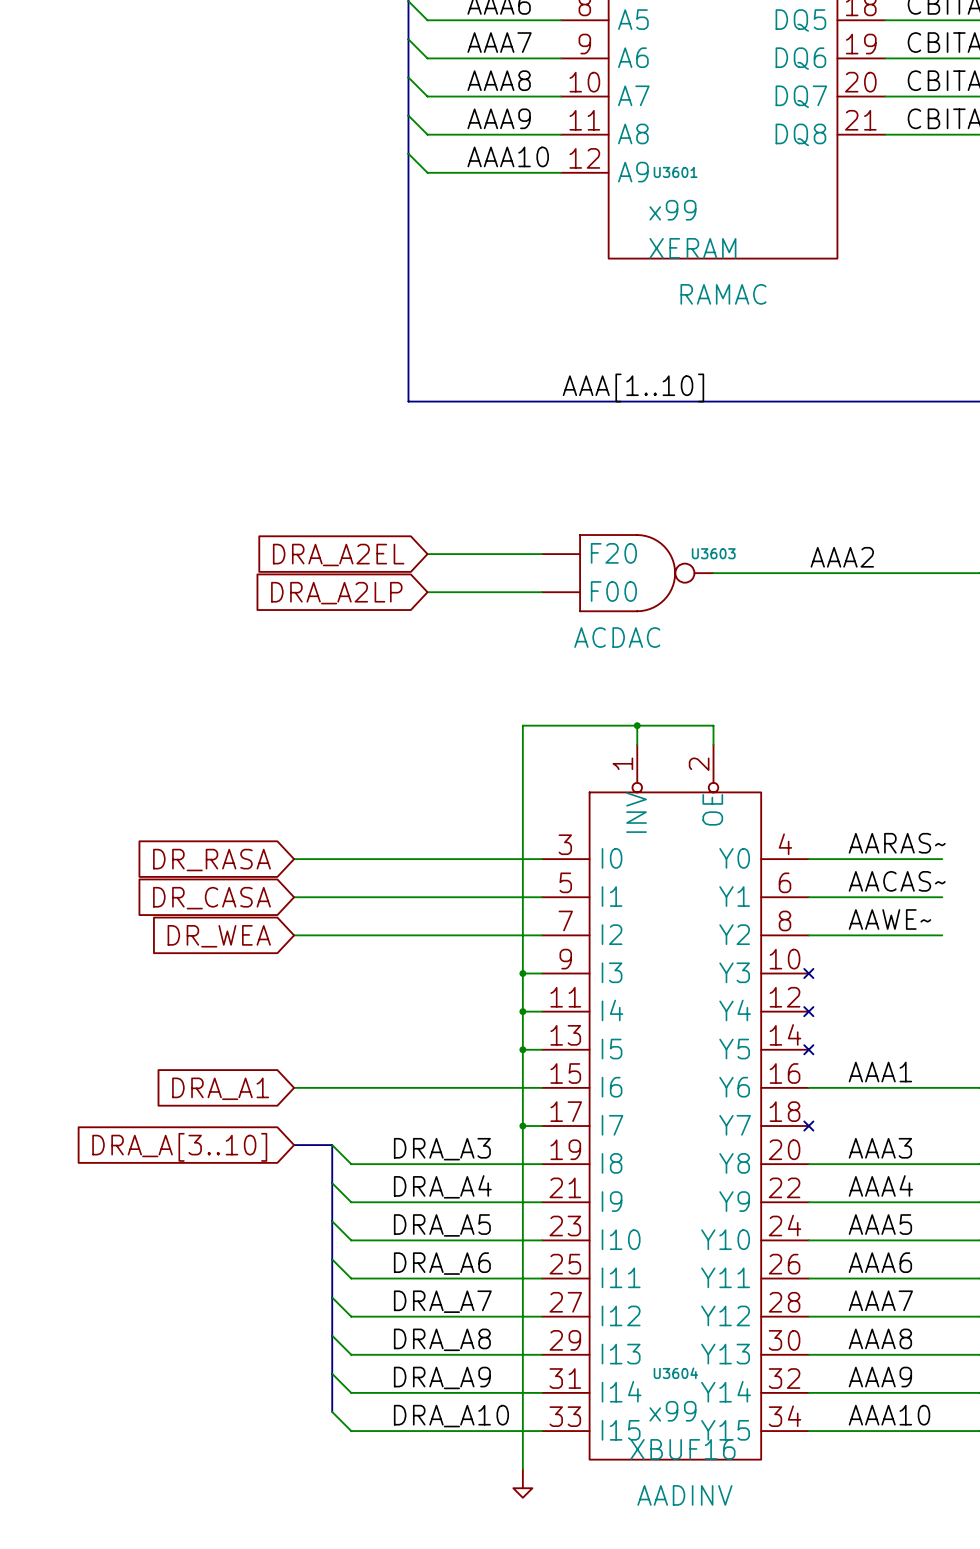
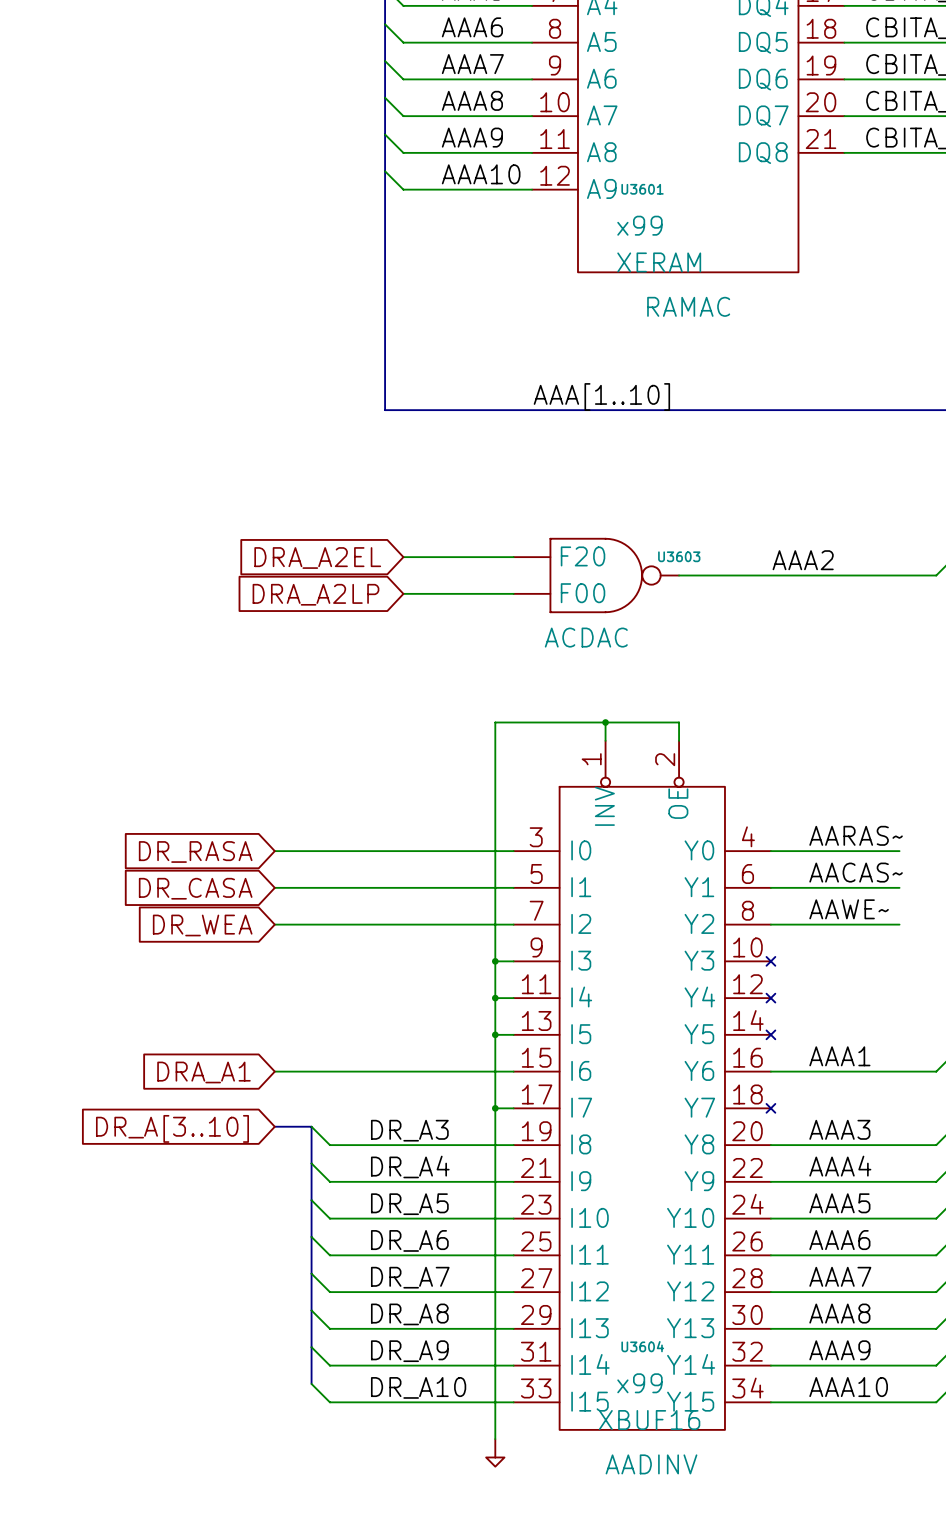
global label: DRA_A[3..10] (179, 1147) -> DR_A[3..10] (172, 1128)
label: DRA_A3 (442, 1149) -> DR_A3 (409, 1130)
label: DRA_A4 (442, 1186) -> DR_A4 (410, 1166)
label: DRA_A5 (442, 1225) -> DR_A5 (409, 1204)
label: DRA_A6 (442, 1263) -> DR_A6 (409, 1240)
label: DRA_A7 (442, 1301) -> DR_A7 (410, 1277)
label: DRA_A8 (442, 1339) -> DR_A8 (409, 1314)
label: DRA_A9 (442, 1377) -> DR_A9 (409, 1351)
label: DRA_A10 (451, 1416) -> DR_A10 (418, 1387)

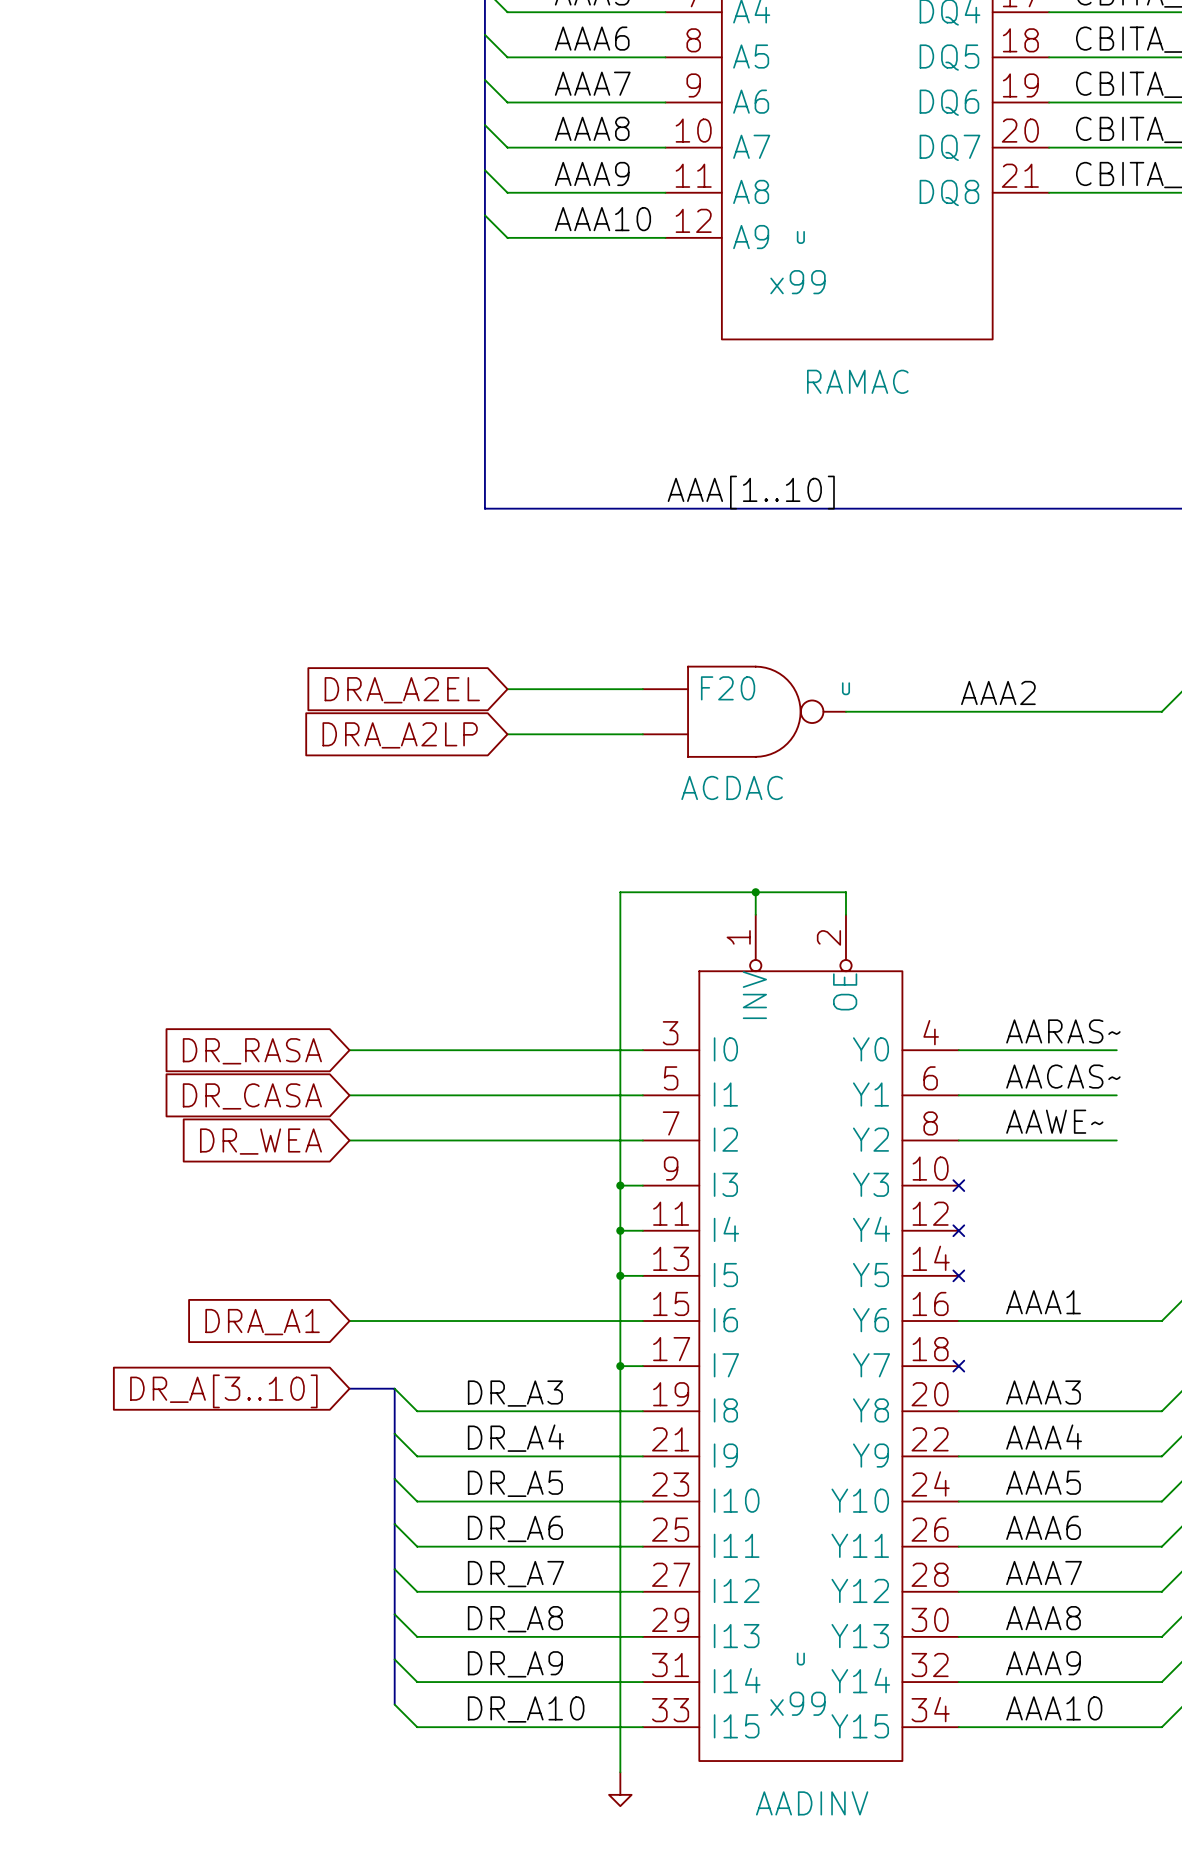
U3601 name: U3601 (642, 189) -> U (800, 237)
U3601 value: XERAM (659, 262) -> none
U3603 name: U3603 (679, 556) -> U (845, 688)
U3603 value: F00 (583, 593) -> none
U3604 name: U3604 (642, 1346) -> U (800, 1659)
U3604 value: XBUF16 (649, 1420) -> none

